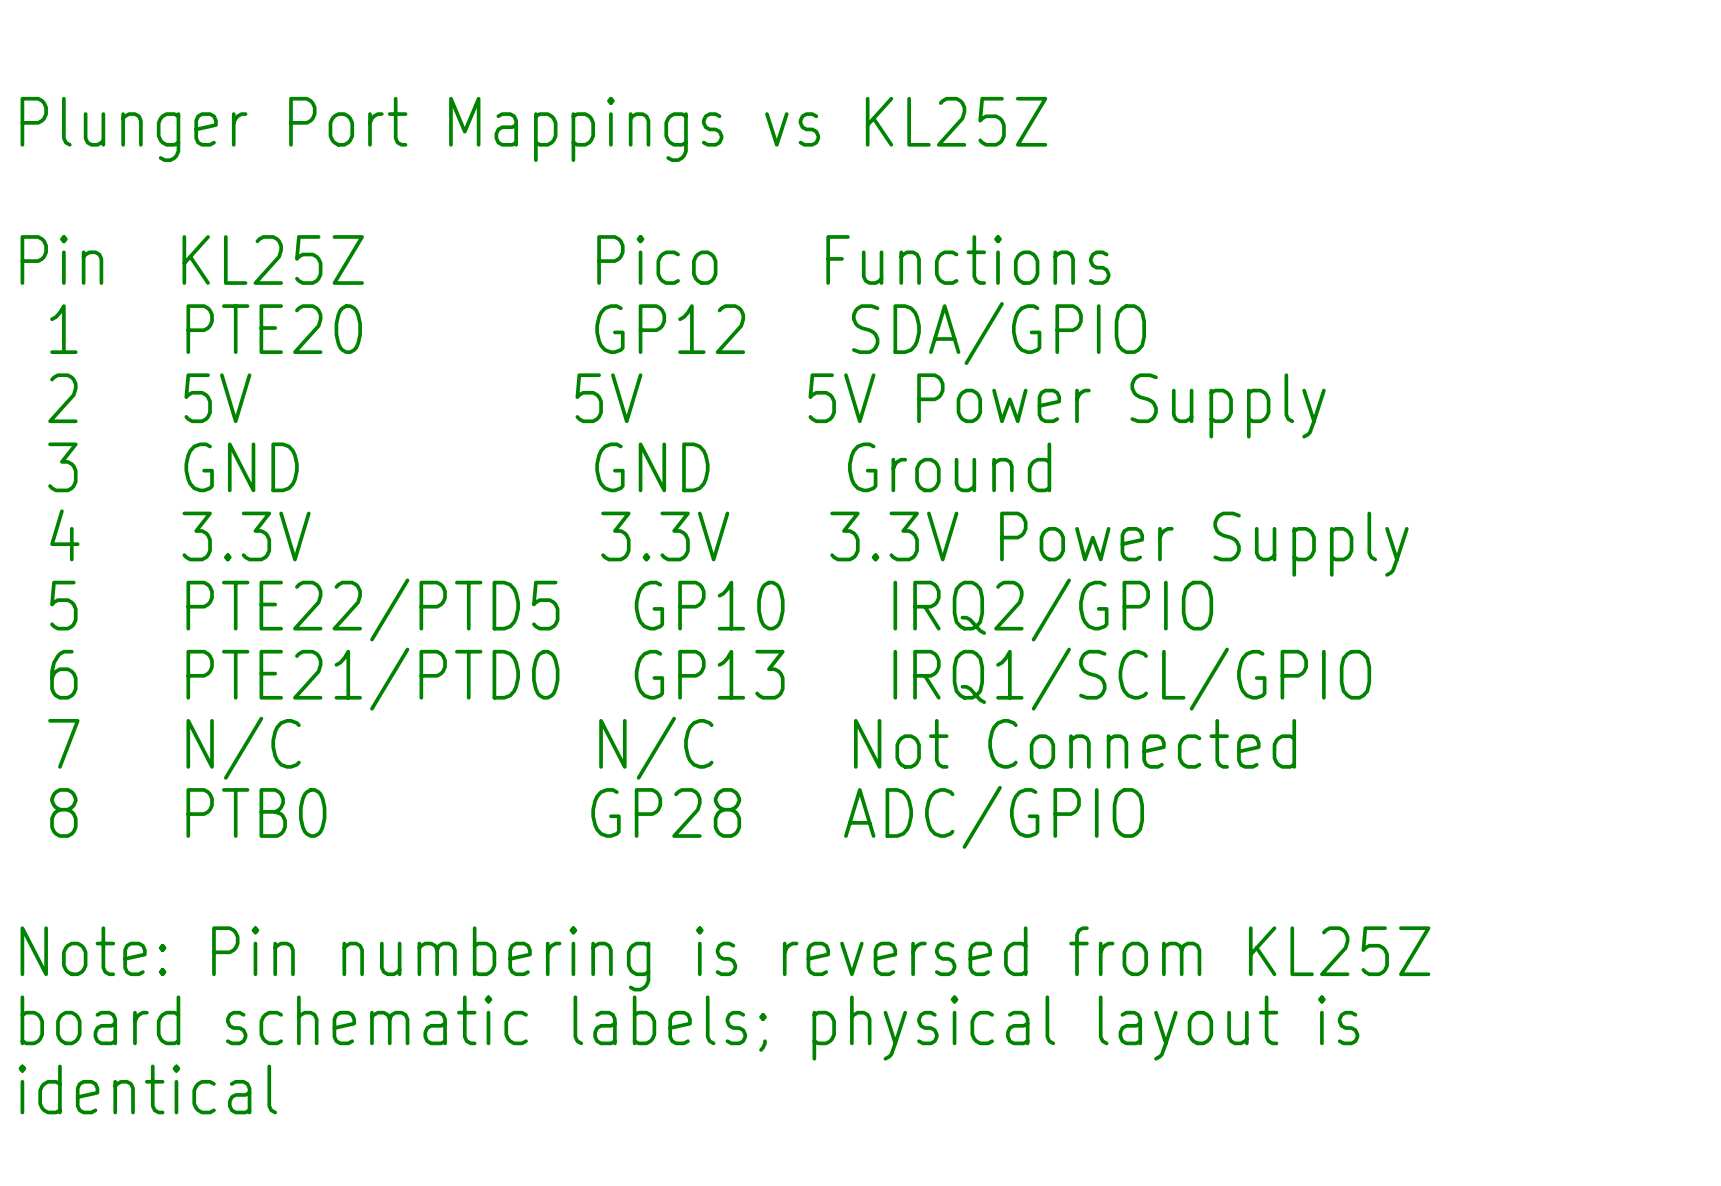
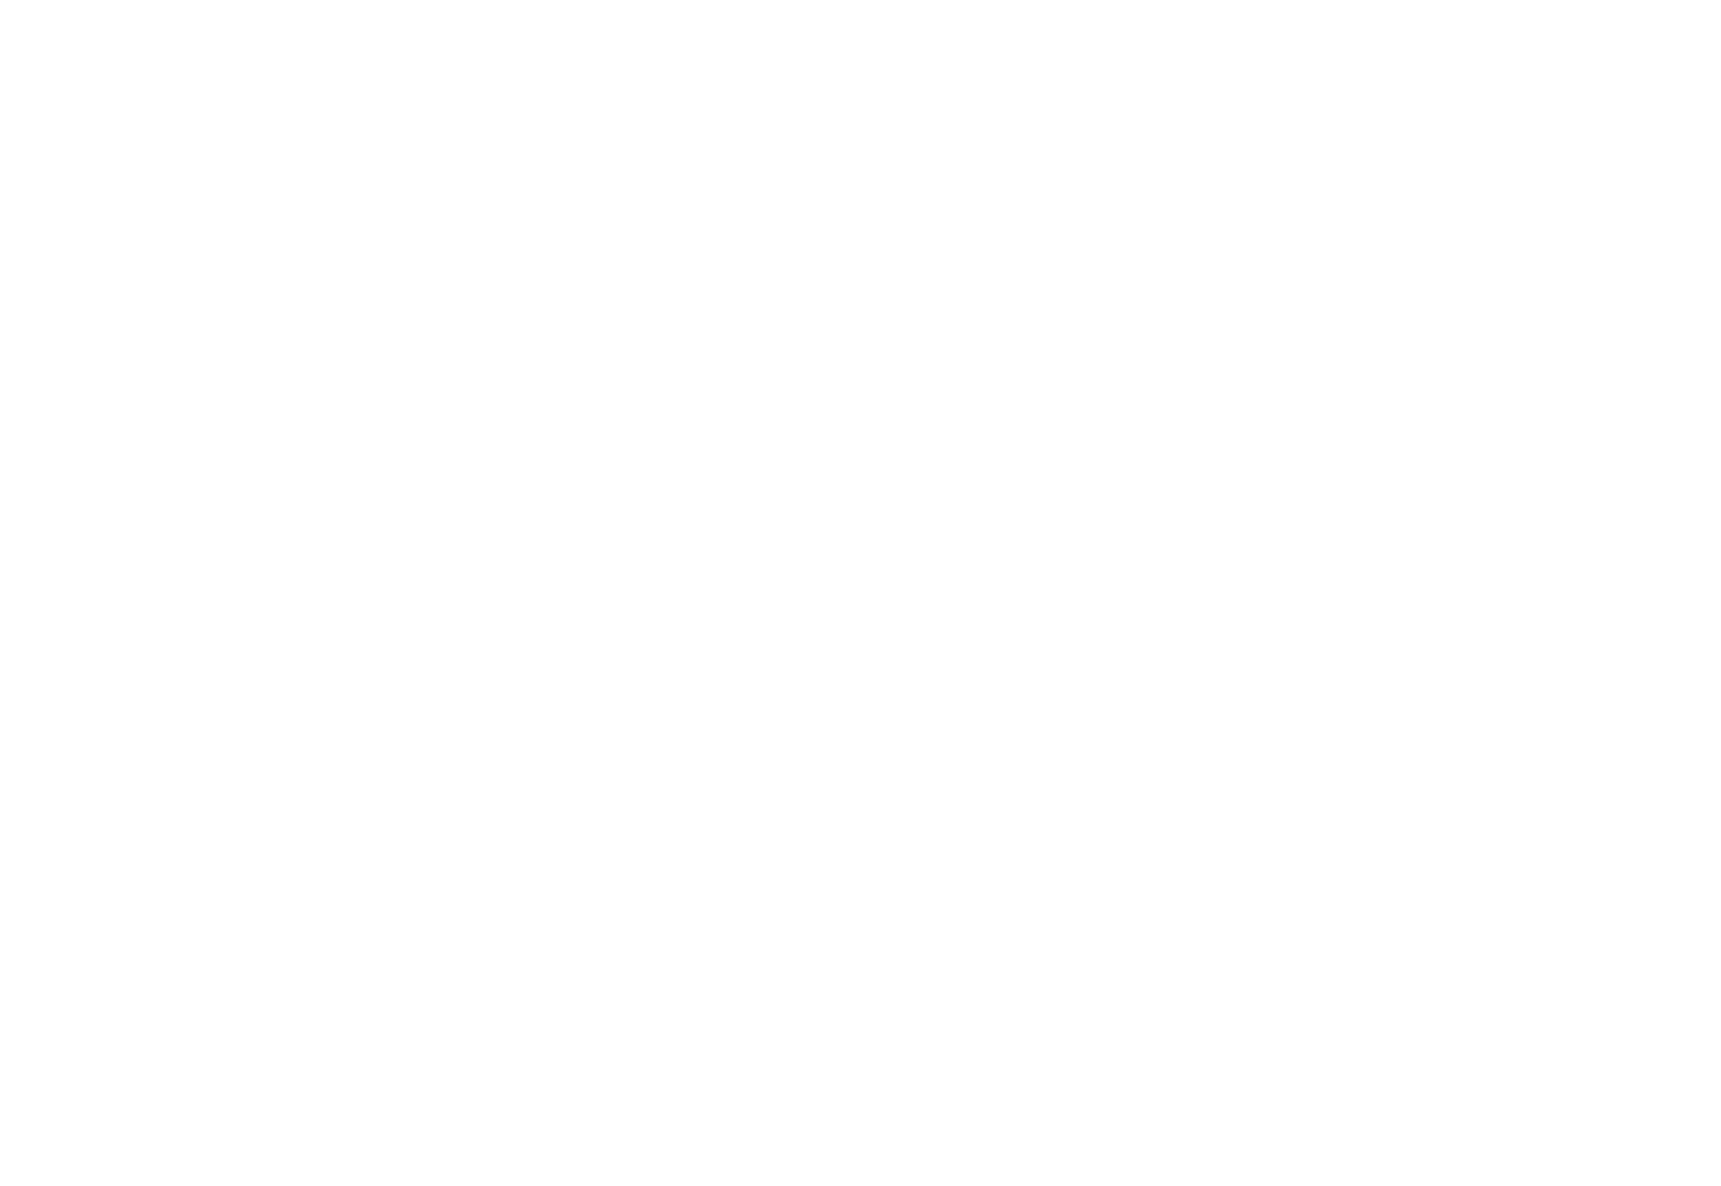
text: Plunger Port Mappings vs KL25Z (533, 129) -> none
text: Pin KL25Z Pico Functions (565, 260) -> none
text: 1 PTE20 GP12 SDA/GPIO (598, 333) -> none
text: 2 5V 5V 5V Power Supply (686, 405) -> none
text: 3 GND GND Ground (549, 467) -> none
text: 4 3.3V 3.3V 3.3V Power Supply (729, 543) -> none
text: 5 PTE22/PTD5 GP10 IRQ2/GPIO (631, 610) -> none
text: 6 PTE21/PTD0 GP13 IRQ1/SCL/GPIO (710, 679) -> none
text: 7 N/C N/C Not Connected (672, 748) -> none
text: 8 PTB0 GP28 ADC/GPIO (597, 817) -> none
text: Note: Pin numbering is reversed from KL25Z (725, 958) -> none
text: board schematic labels; physical layout is (689, 1028) -> none
text: identical (147, 1089) -> none

